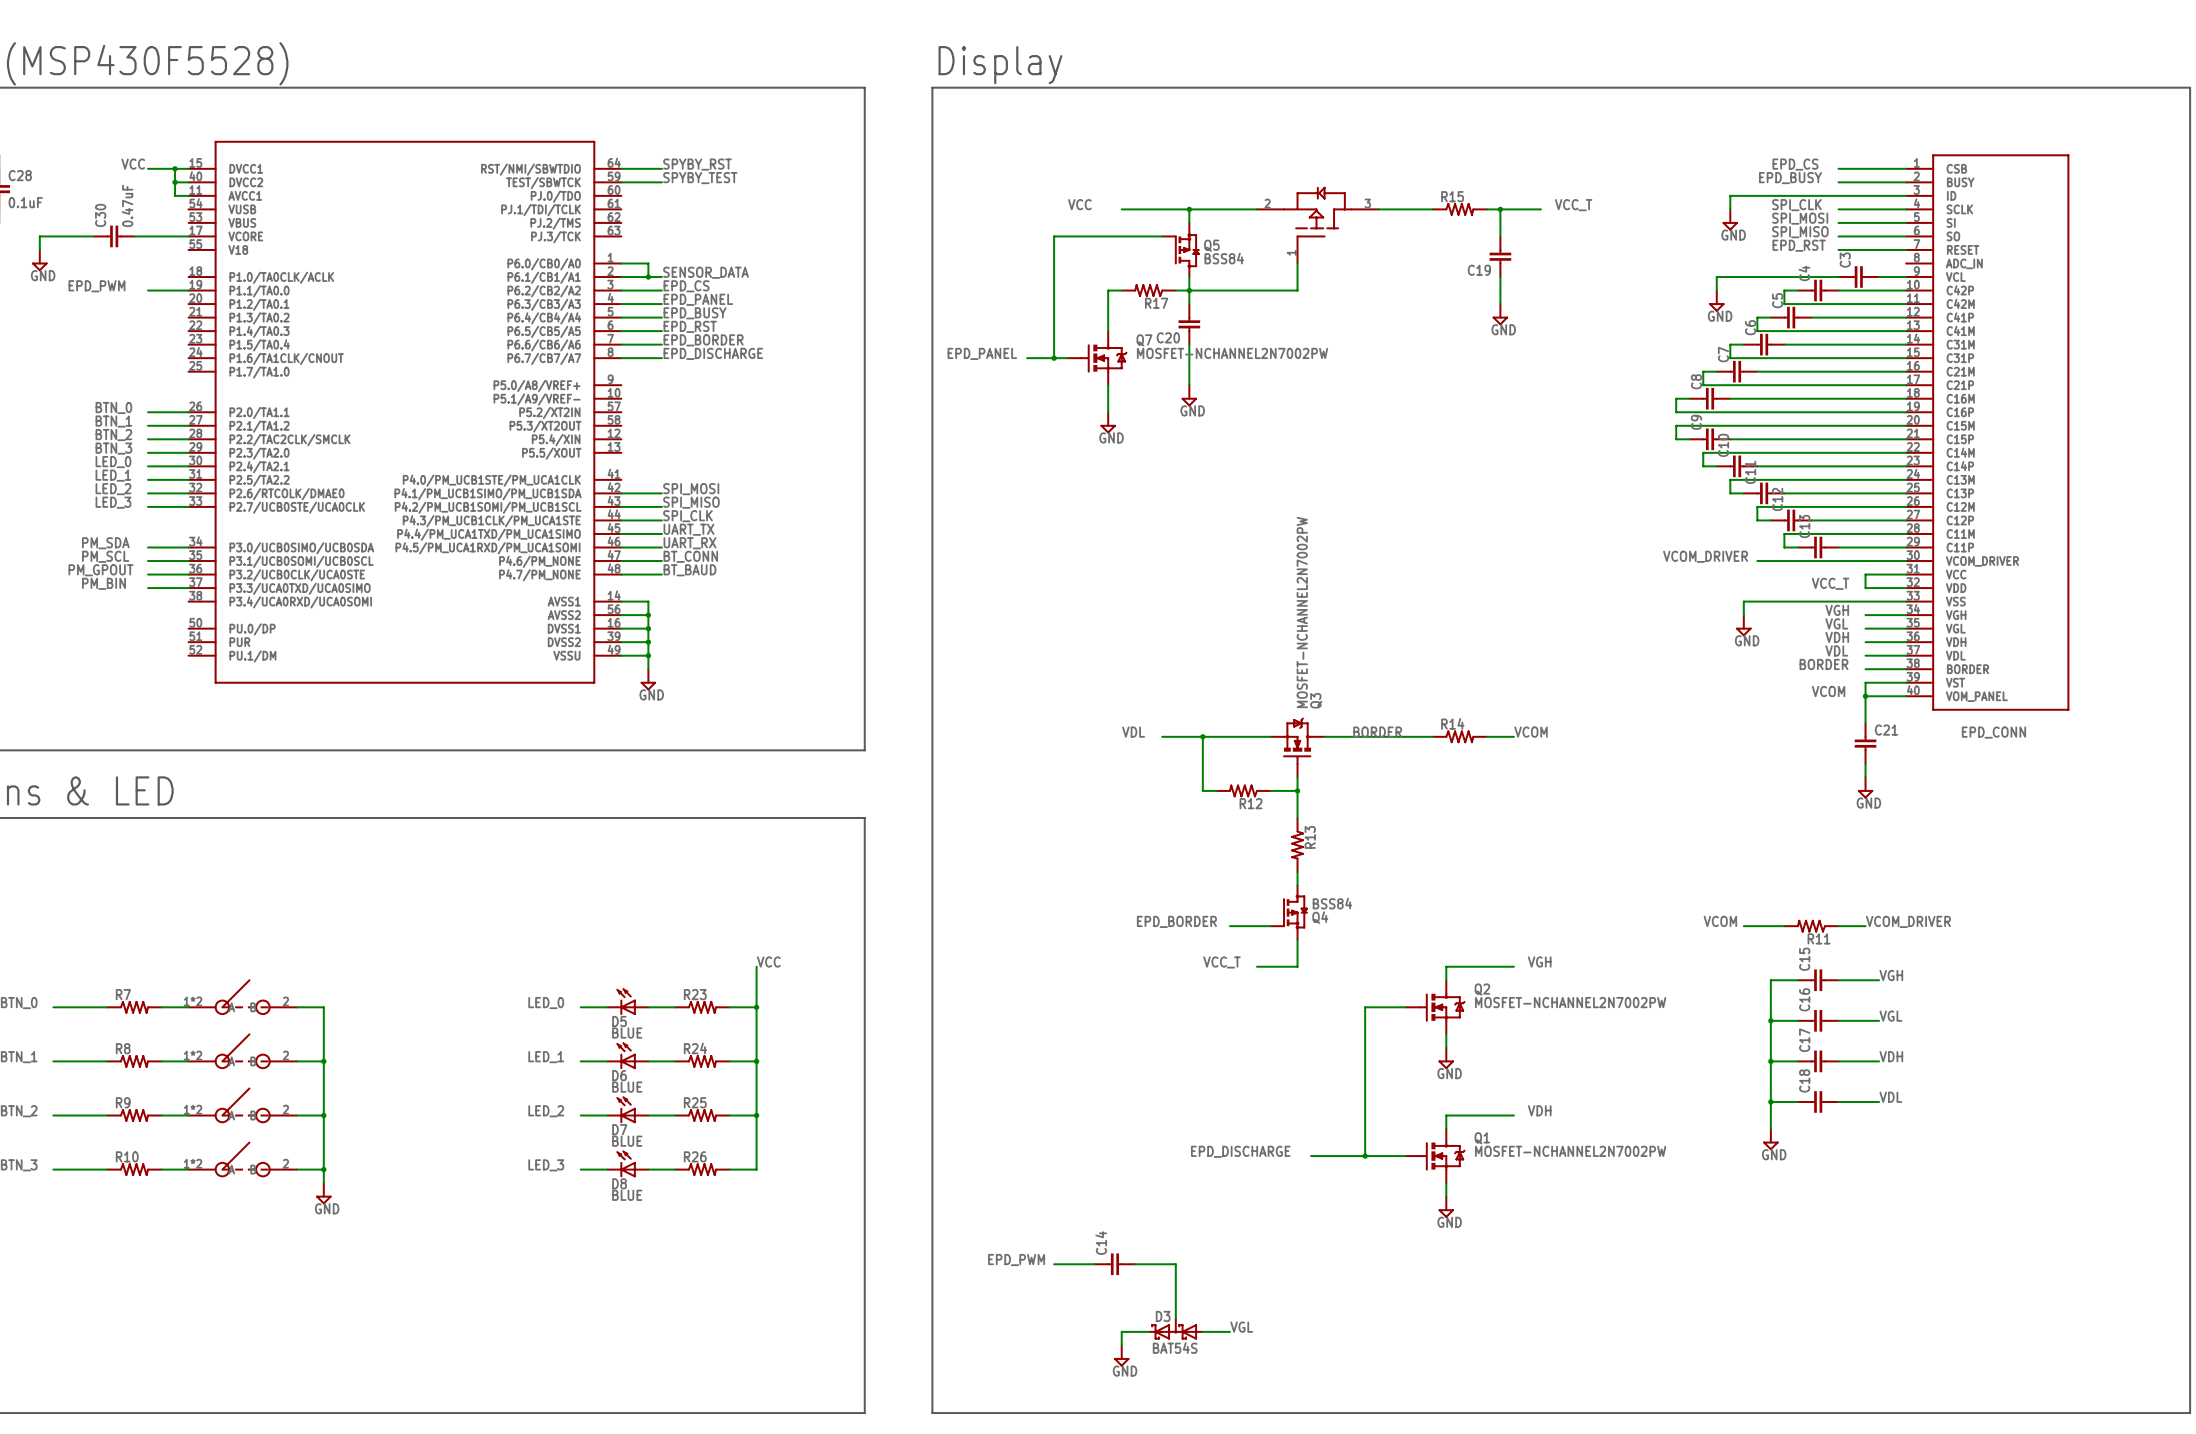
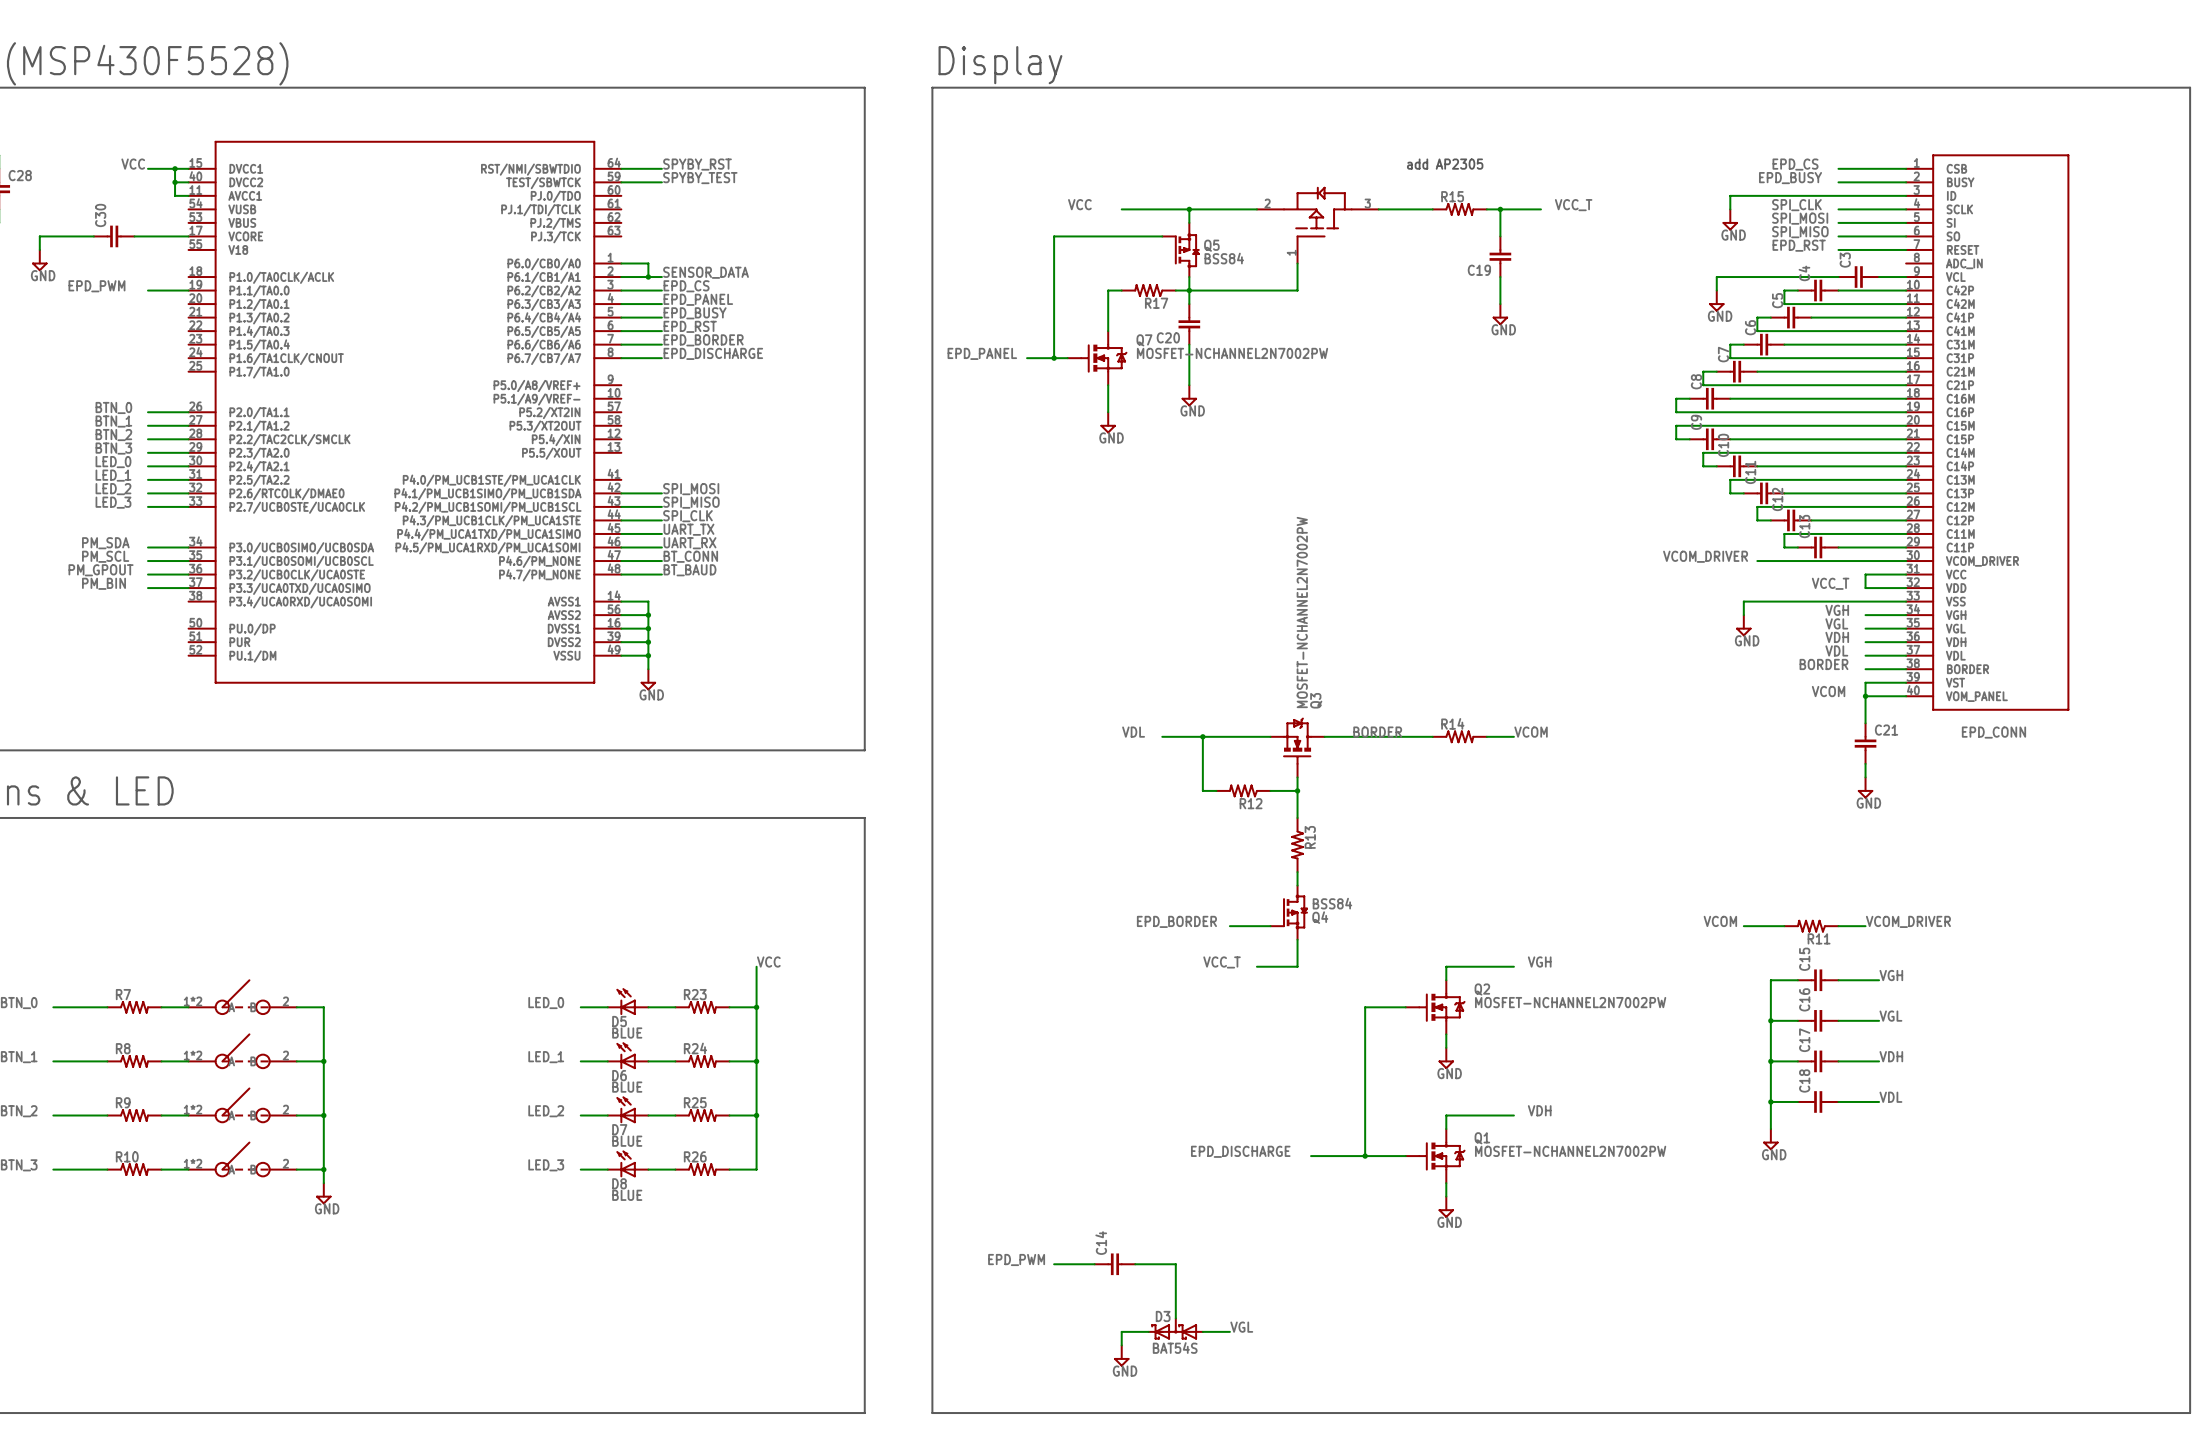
text: none -> add AP2305 (1445, 164)
C28 value: 0.1uF (25, 202) -> none
C30 value: 0.47uF (127, 205) -> none

